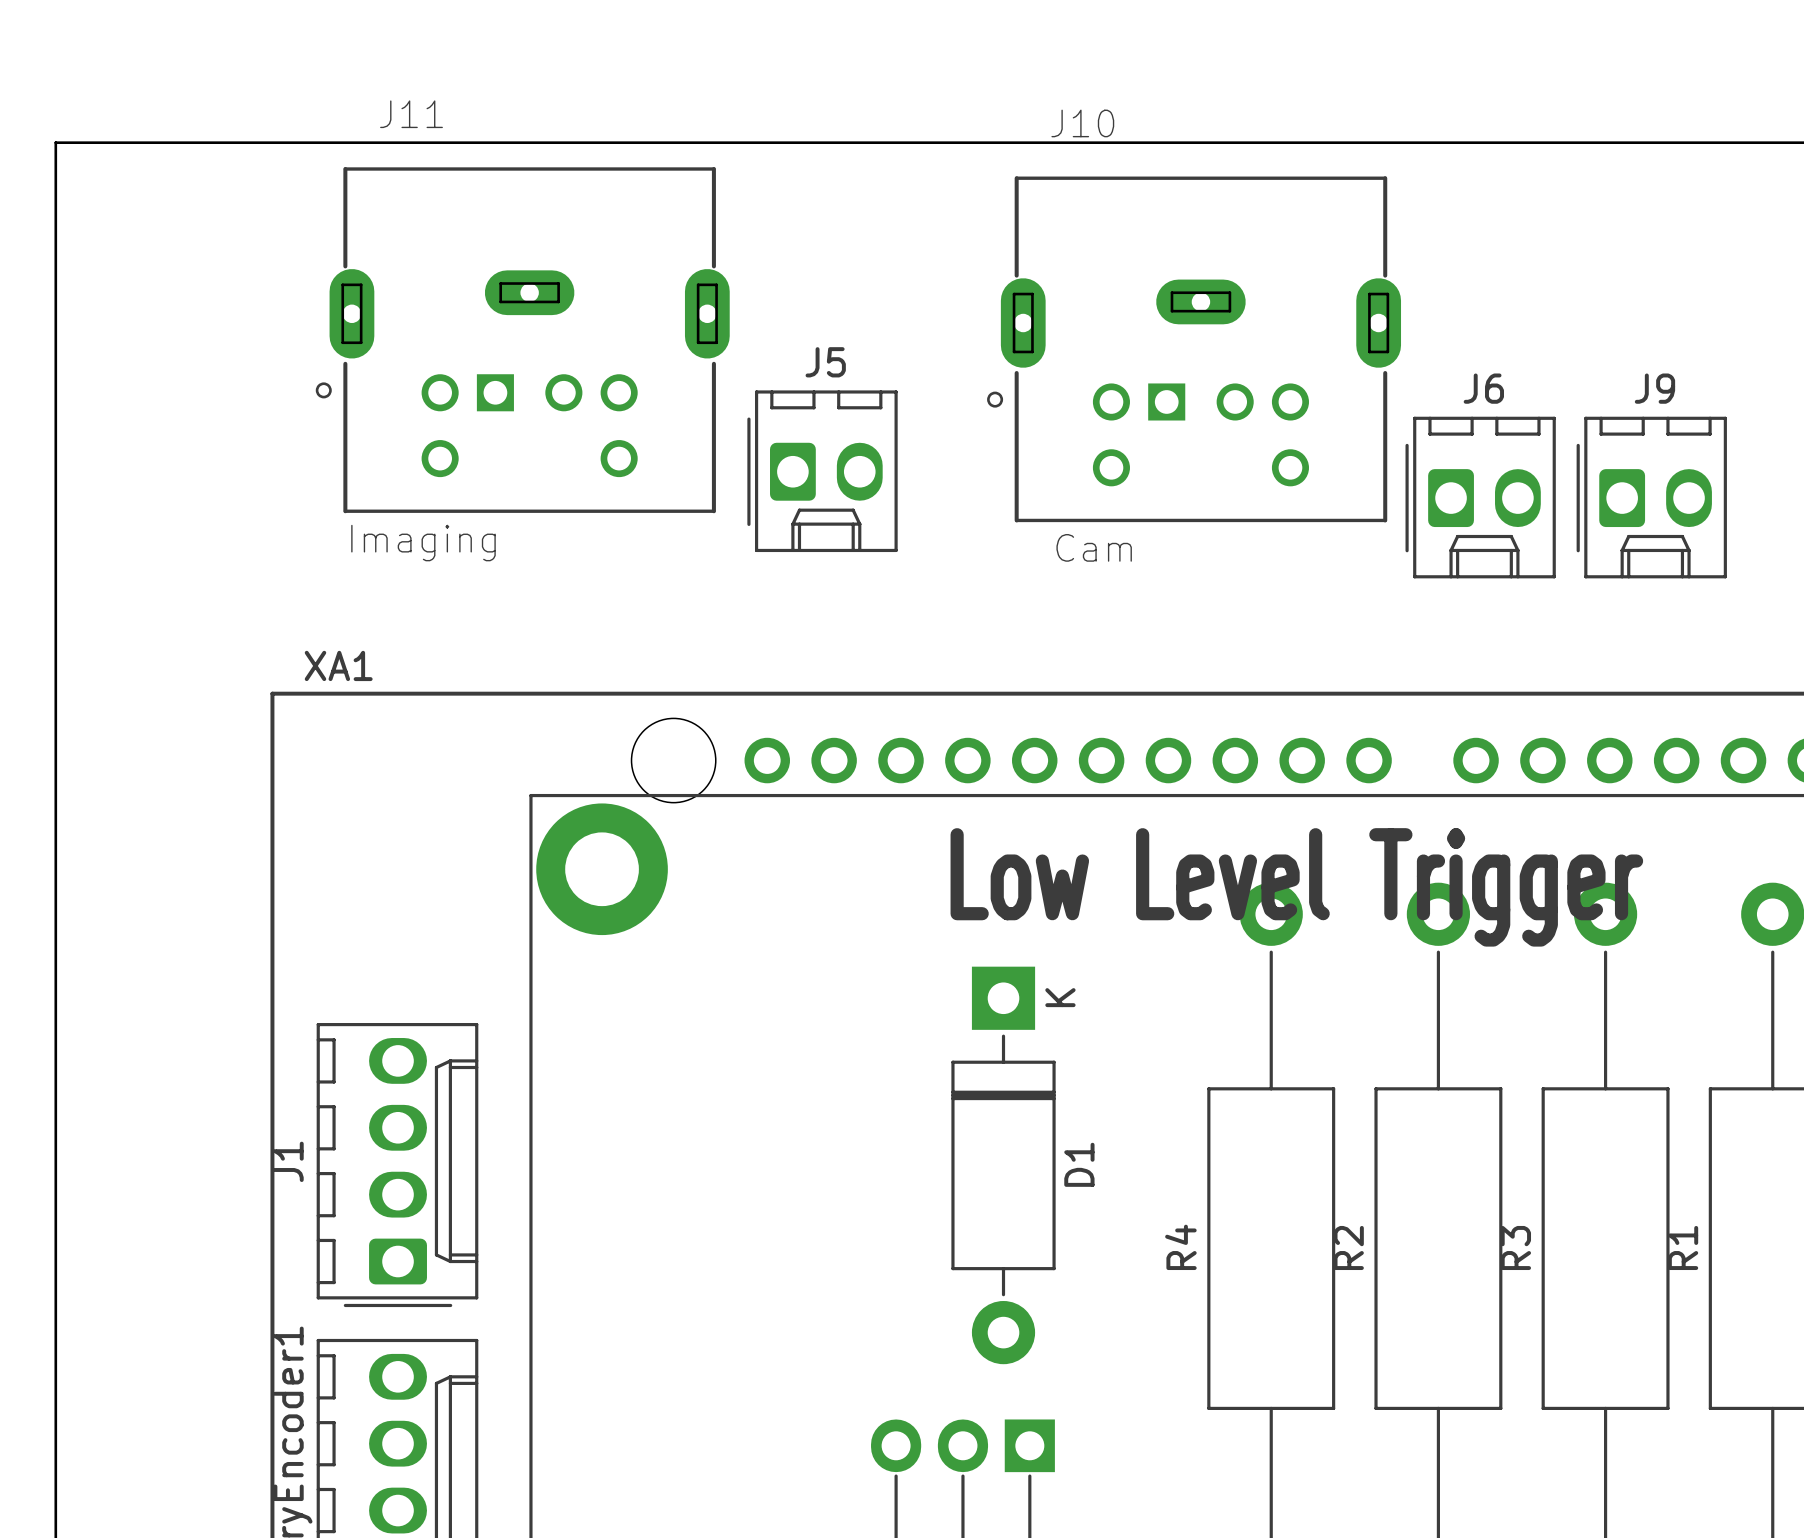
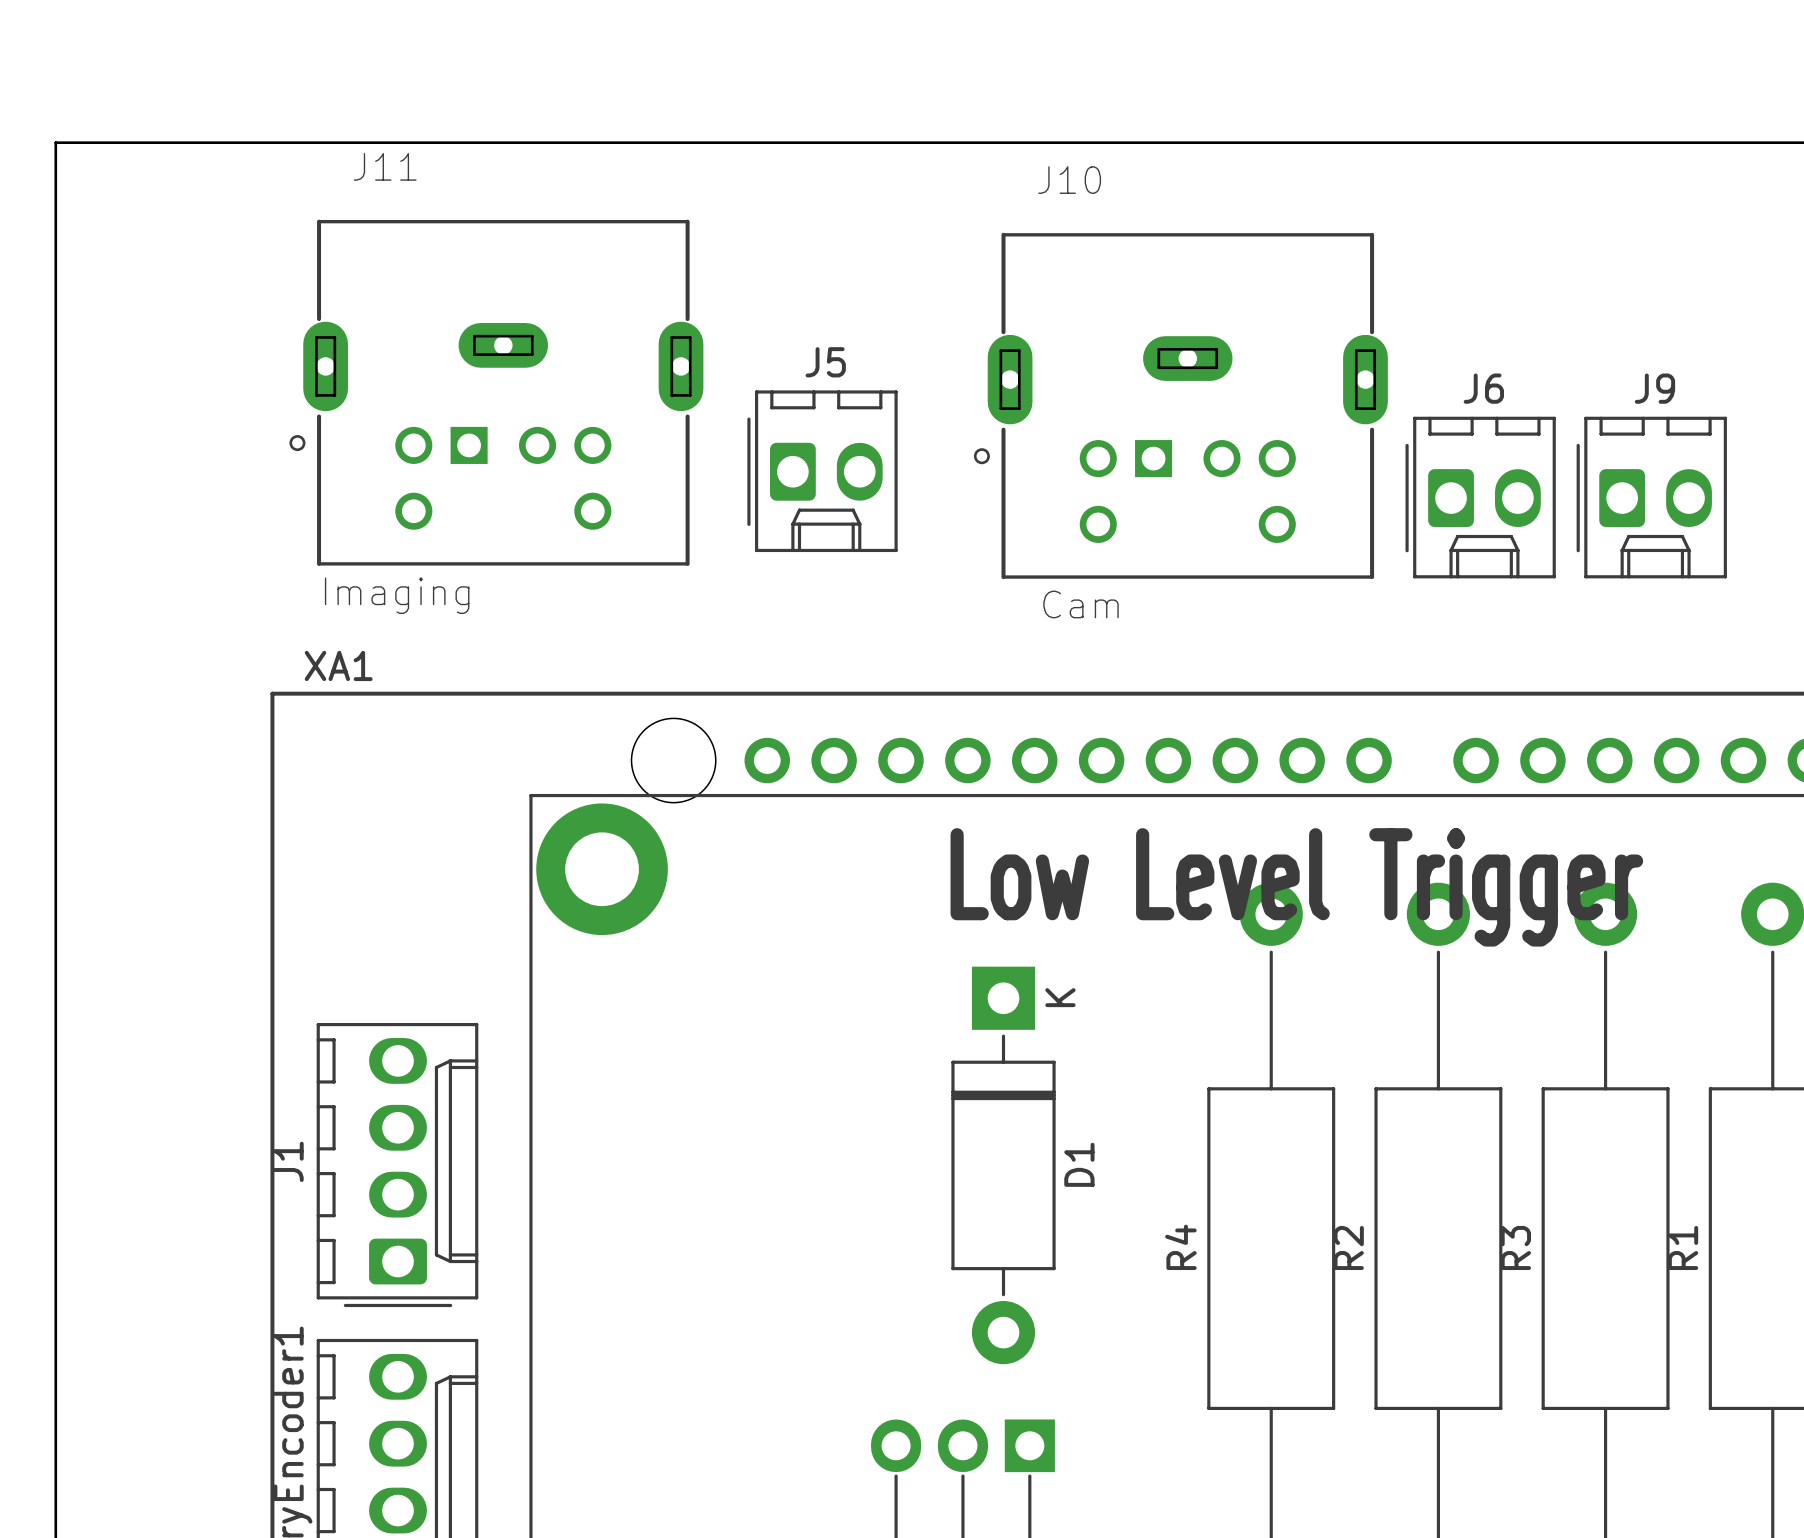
J11 position: (522, 340) -> (496, 392)
J10 position: (1194, 349) -> (1180, 405)

